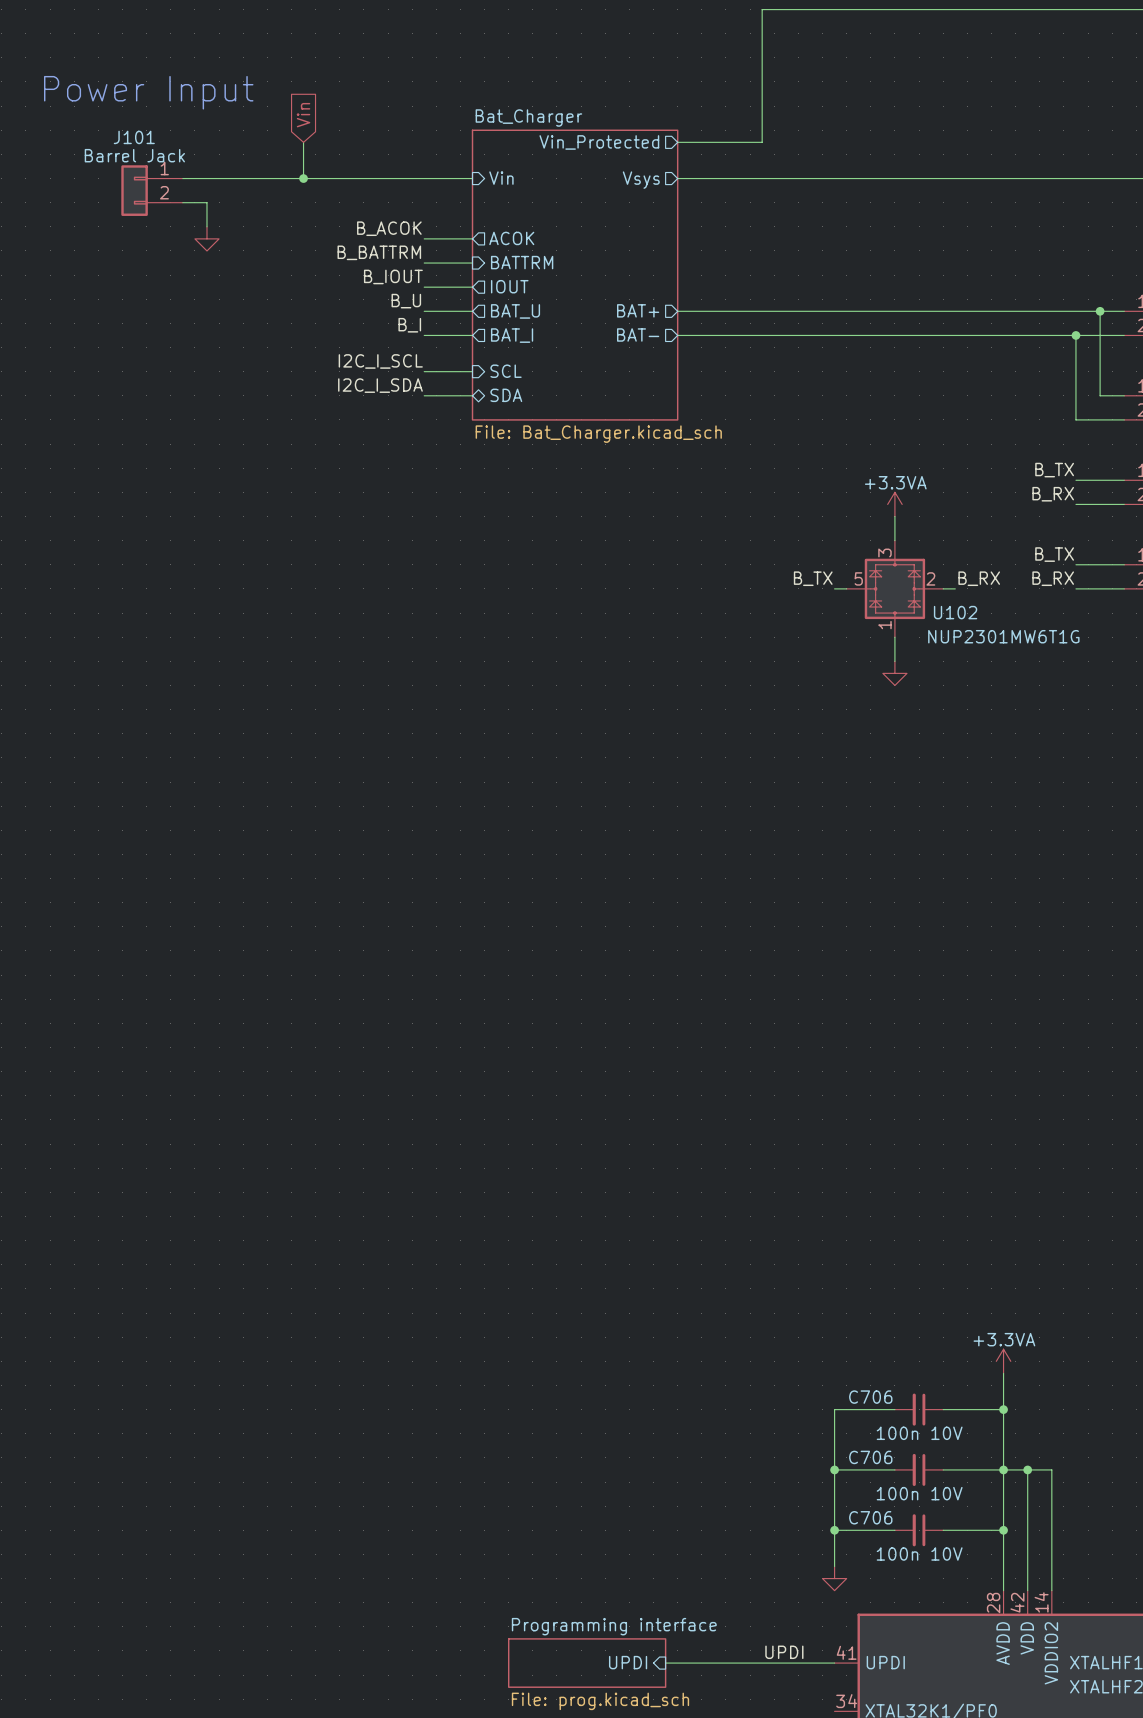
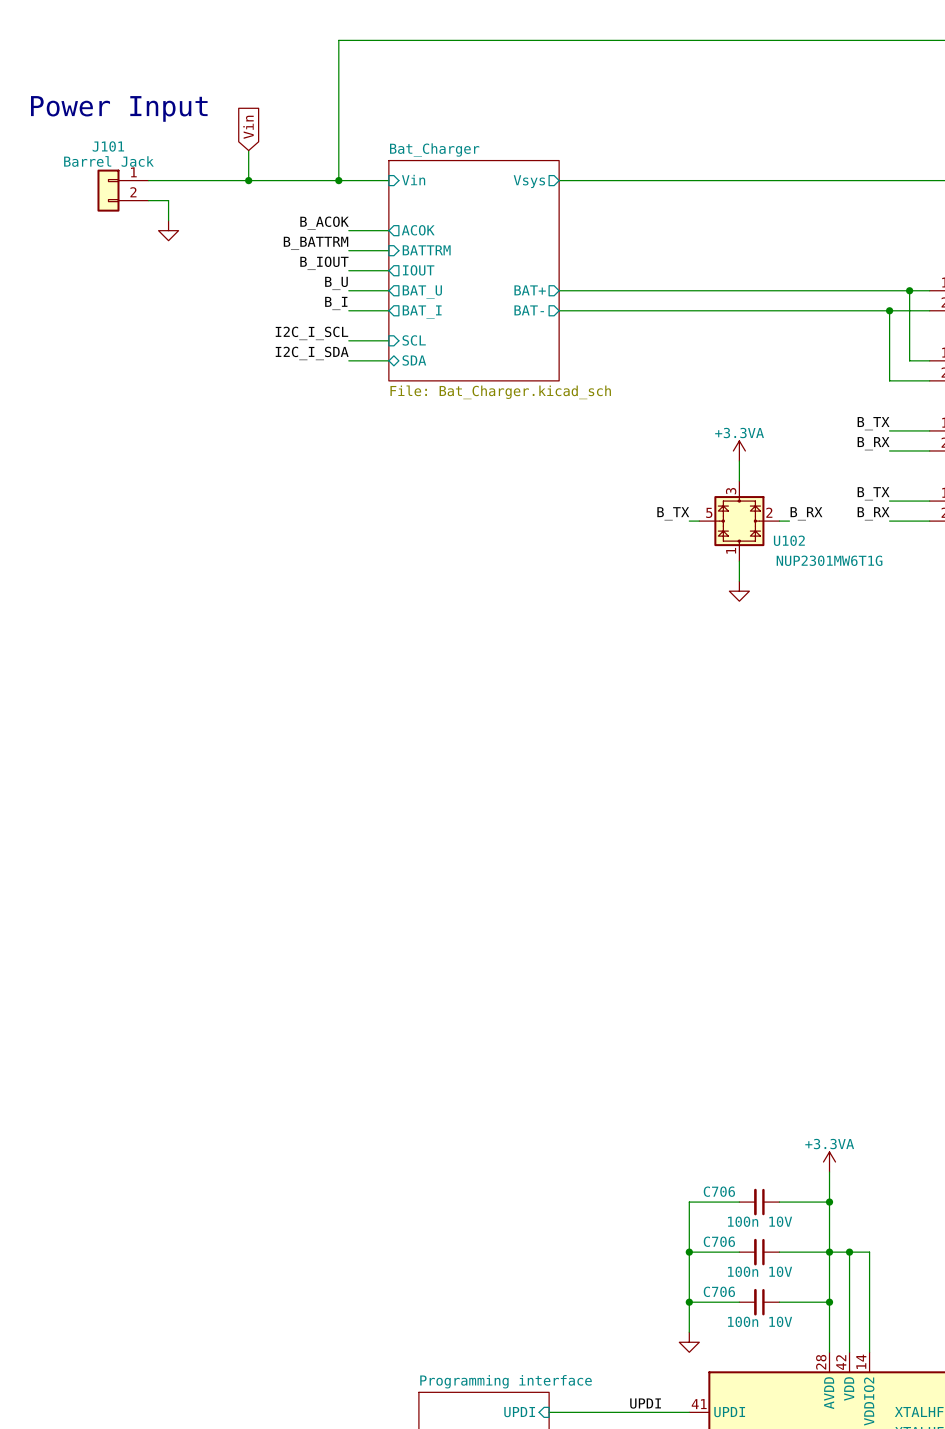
wire: (762, 9) (762, 142) (677, 142) -> (629, 40) (338, 40) (338, 180)
sheet pin: Vin_Protected (599, 142) -> none
junction: none -> (338, 180)
sheet Bat_Charger: File: Bat_Charger.kicad_sch (575, 275) -> none
sheet Bat_Charger: none -> File: Bat_Charger.kicad_sch (474, 270)

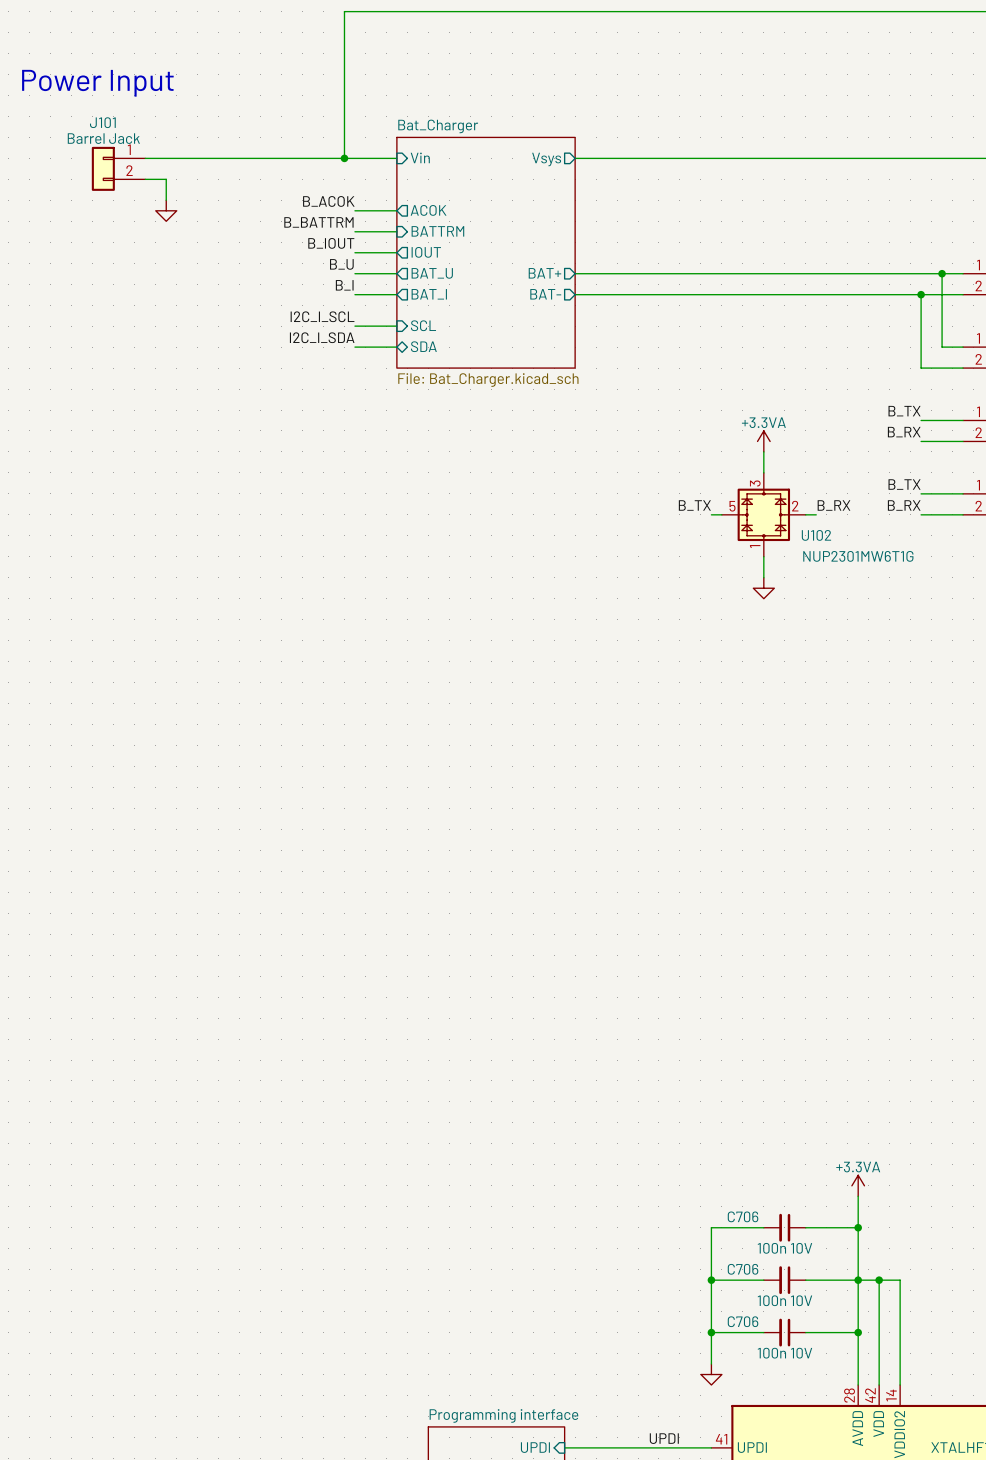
global label: Vin (248, 127) -> none
wire: (248, 150) (248, 180) -> none
junction: (248, 180) -> none

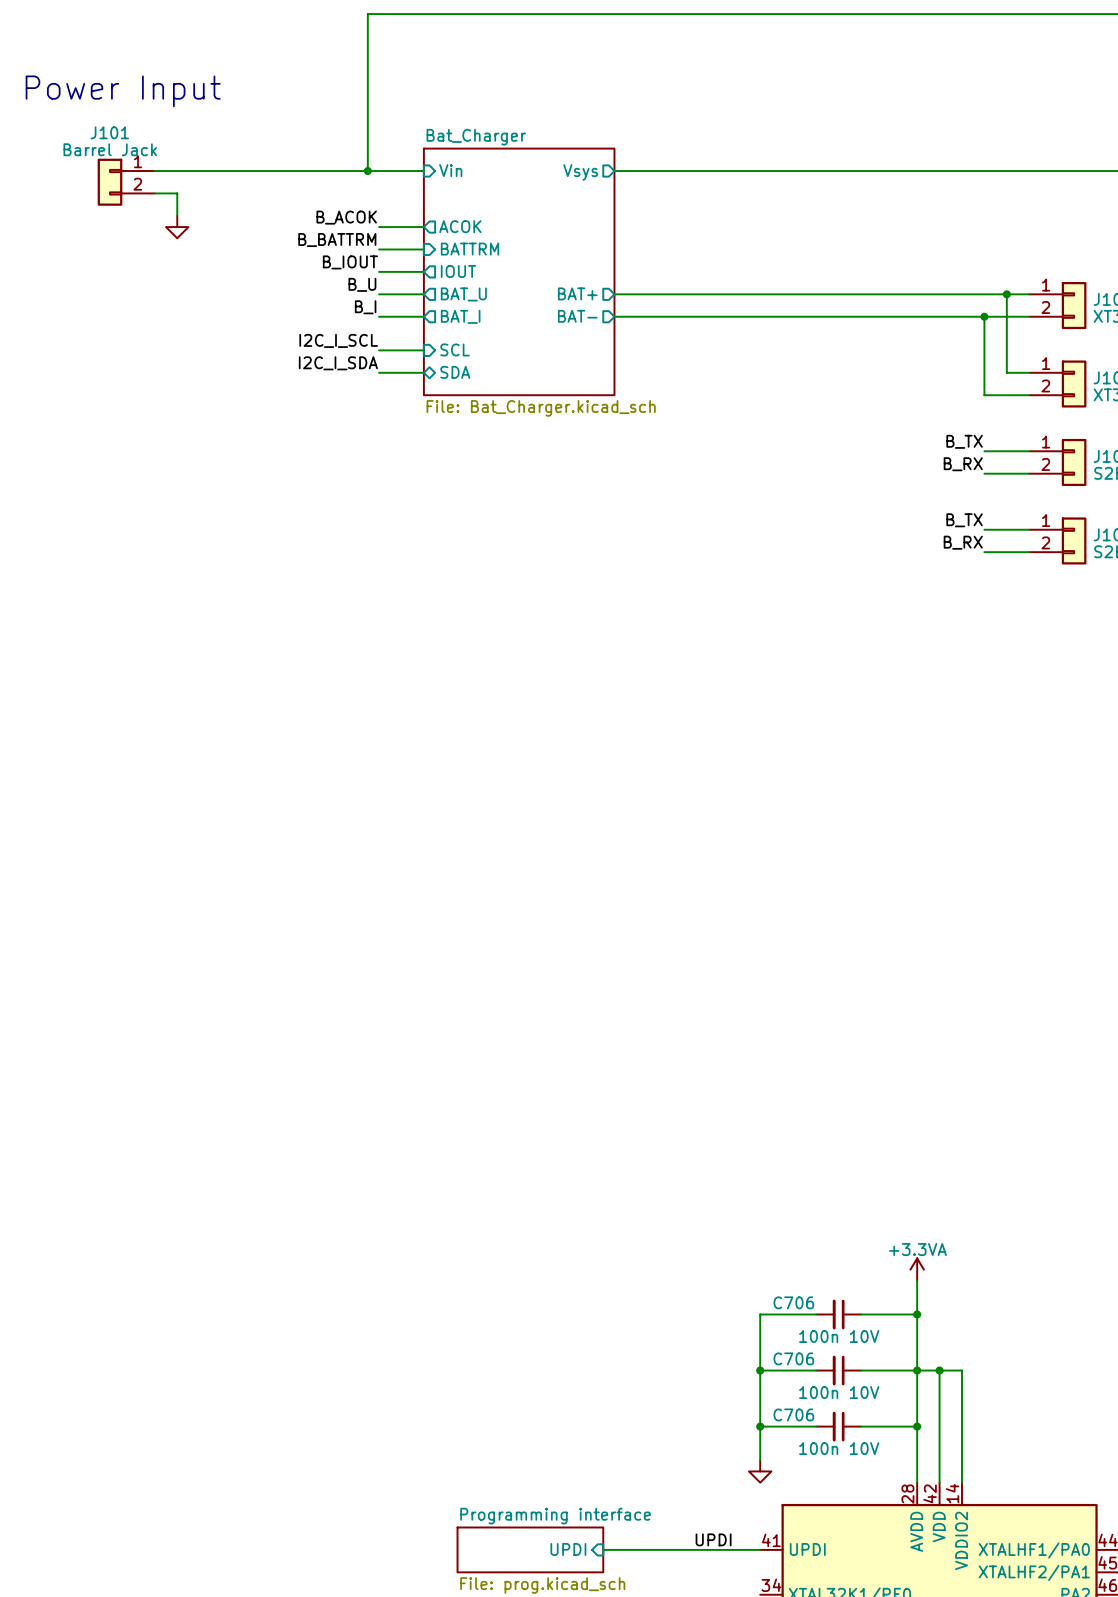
power symbol: +3.3VA (763, 441) -> none
wire: (763, 451) (763, 472) -> none
label: B_TX (694, 505) -> none
label: B_RX (833, 505) -> none
wire: (711, 514) (721, 514) -> none
U102: NUP2301MW6T1G (763, 514) -> none
wire: (805, 514) (816, 514) -> none
wire: (763, 556) (763, 577) -> none
power symbol: (763, 588) -> none

